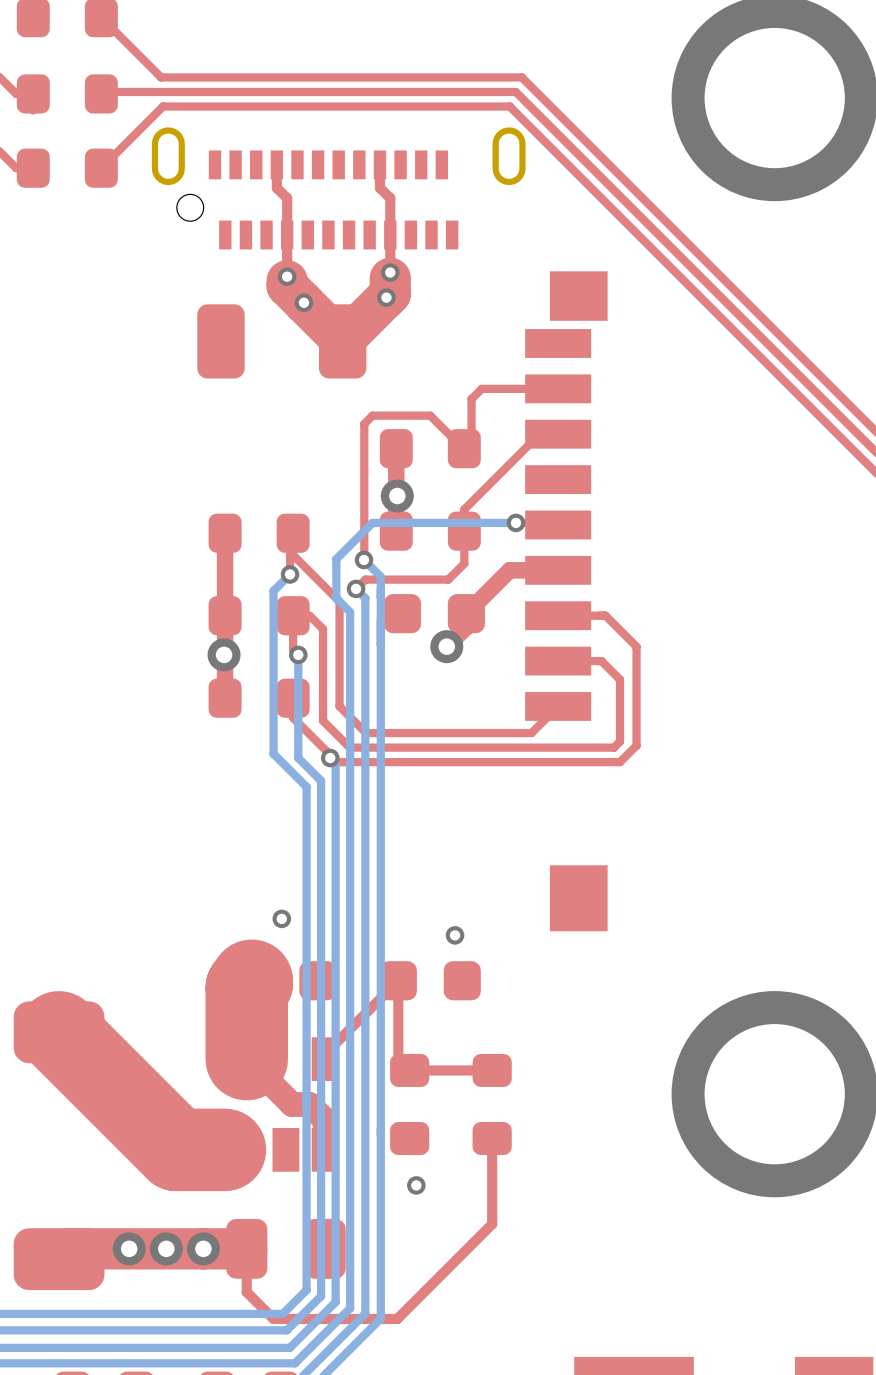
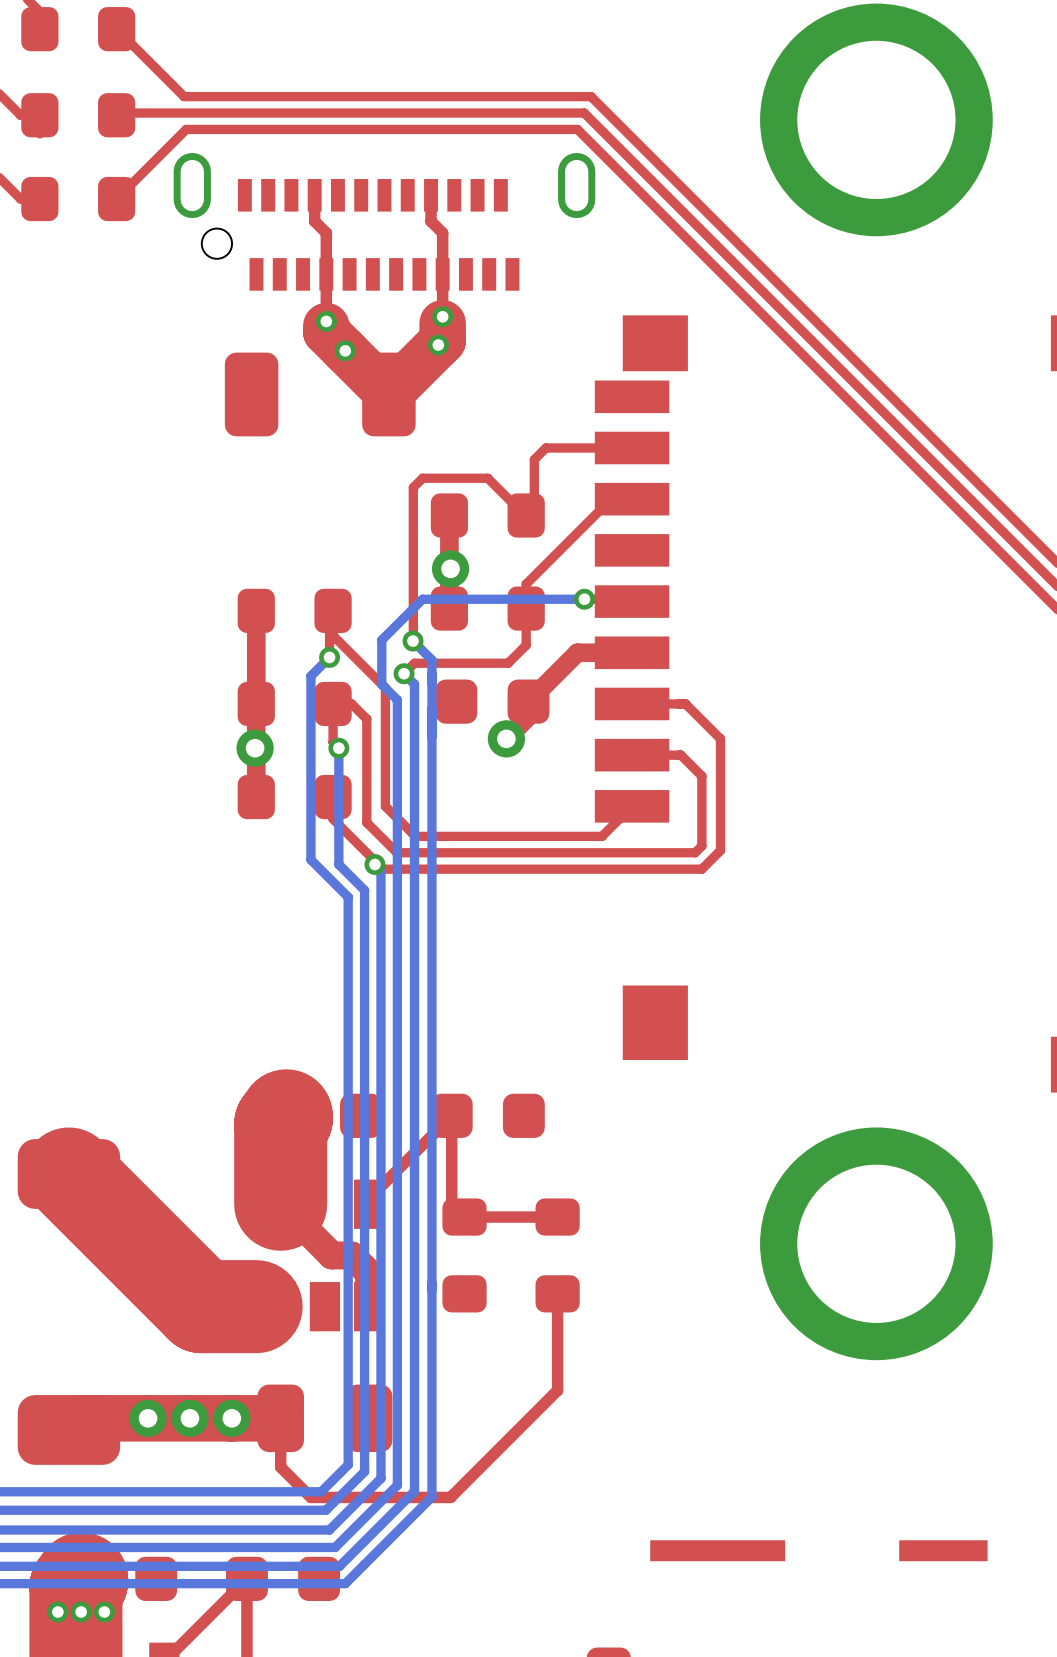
via: (281, 918) -> none
via: (455, 935) -> none
via: (416, 1185) -> none

